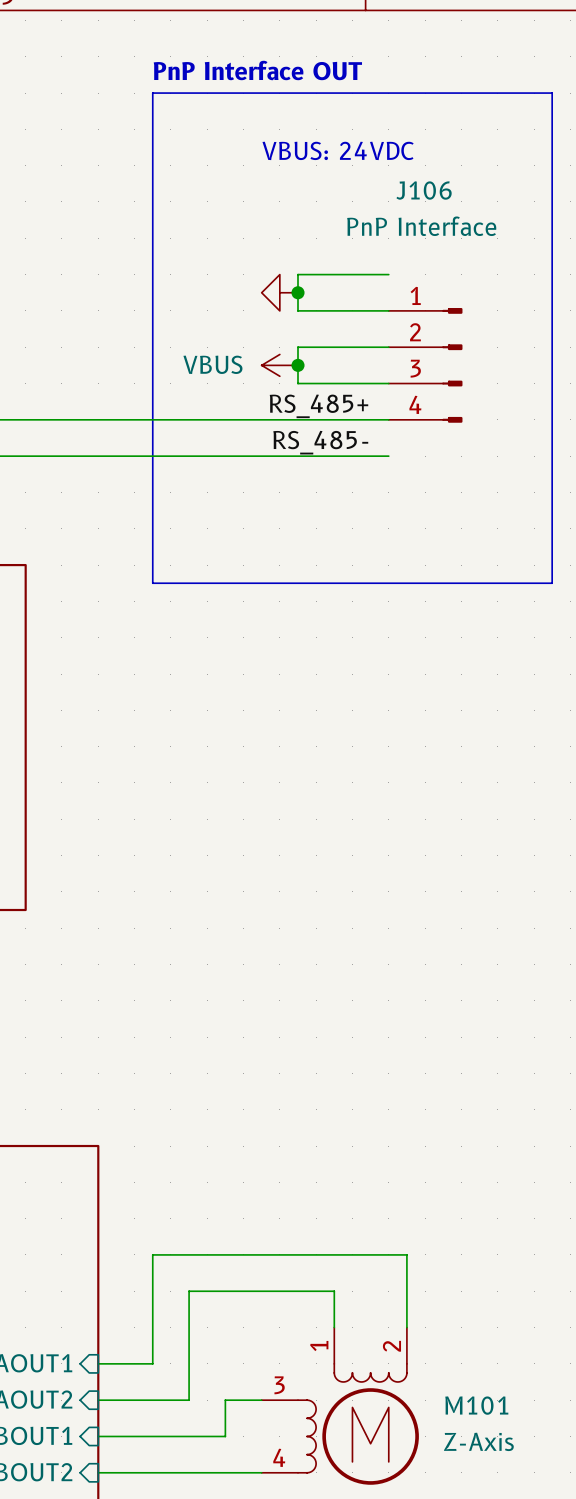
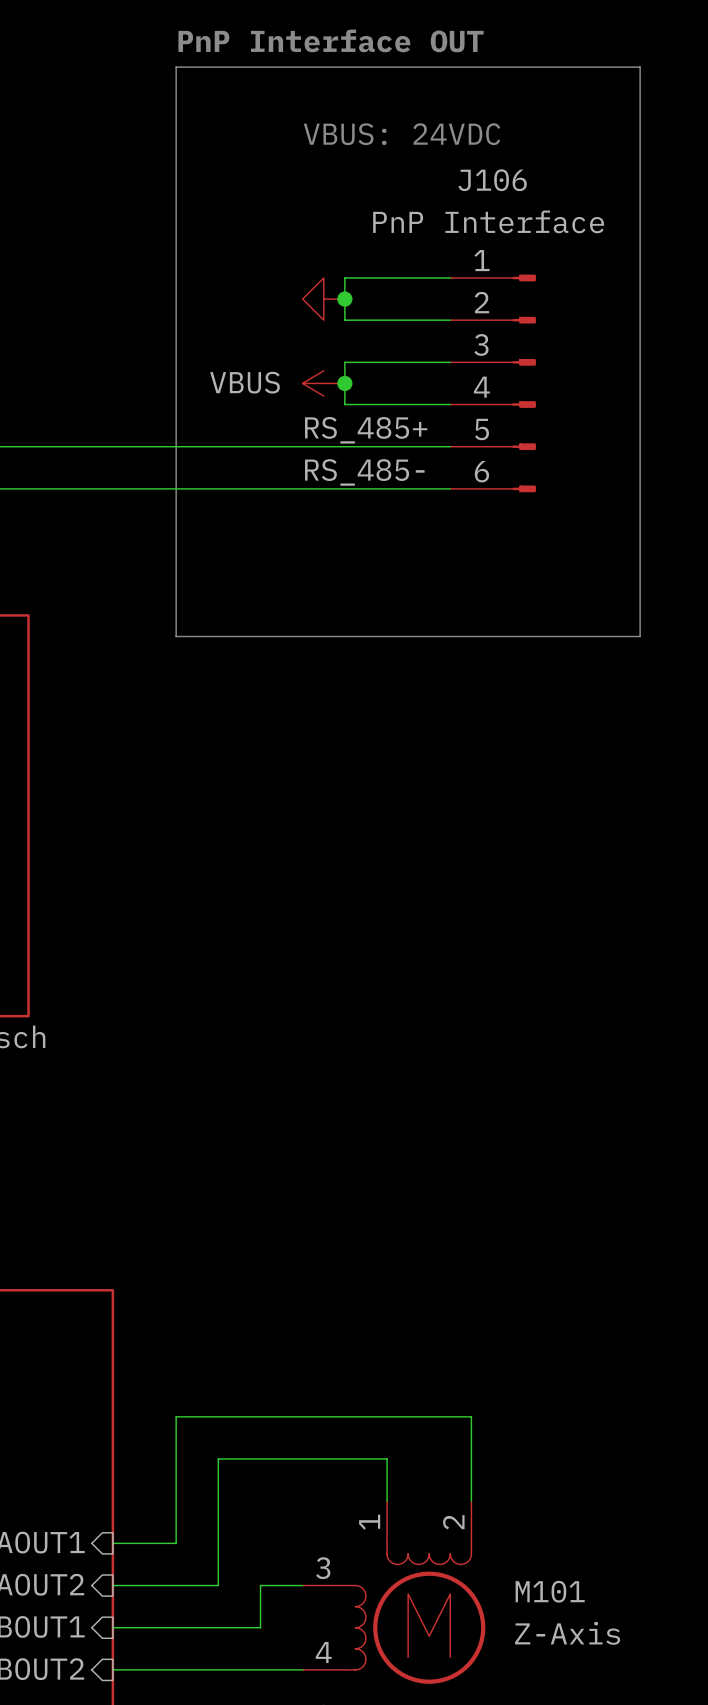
J106 symbol: [388, 308, 463, 423] -> [450, 274, 536, 493]

